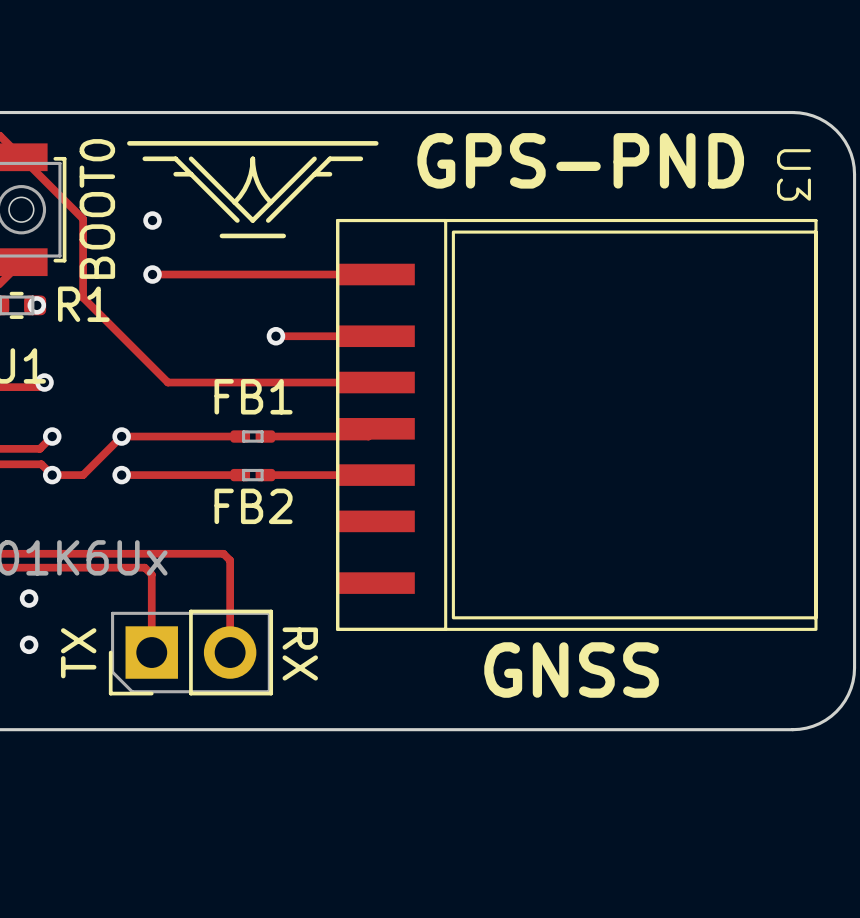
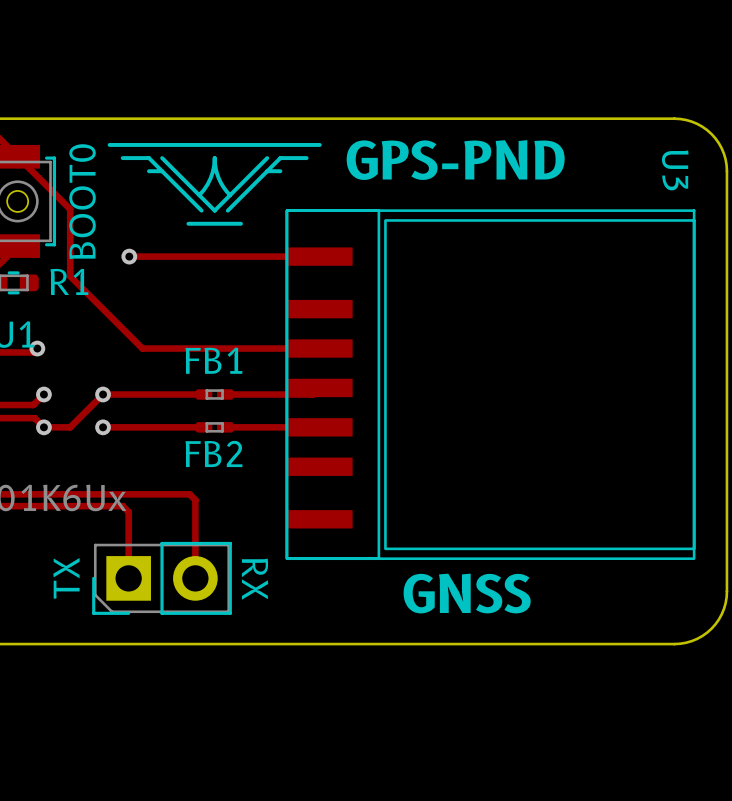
via: (152, 220) -> none
via: (36, 305) -> none
track: (275, 336) (376, 336) -> none
via: (275, 336) -> none
via: (29, 598) -> none
via: (29, 644) -> none

